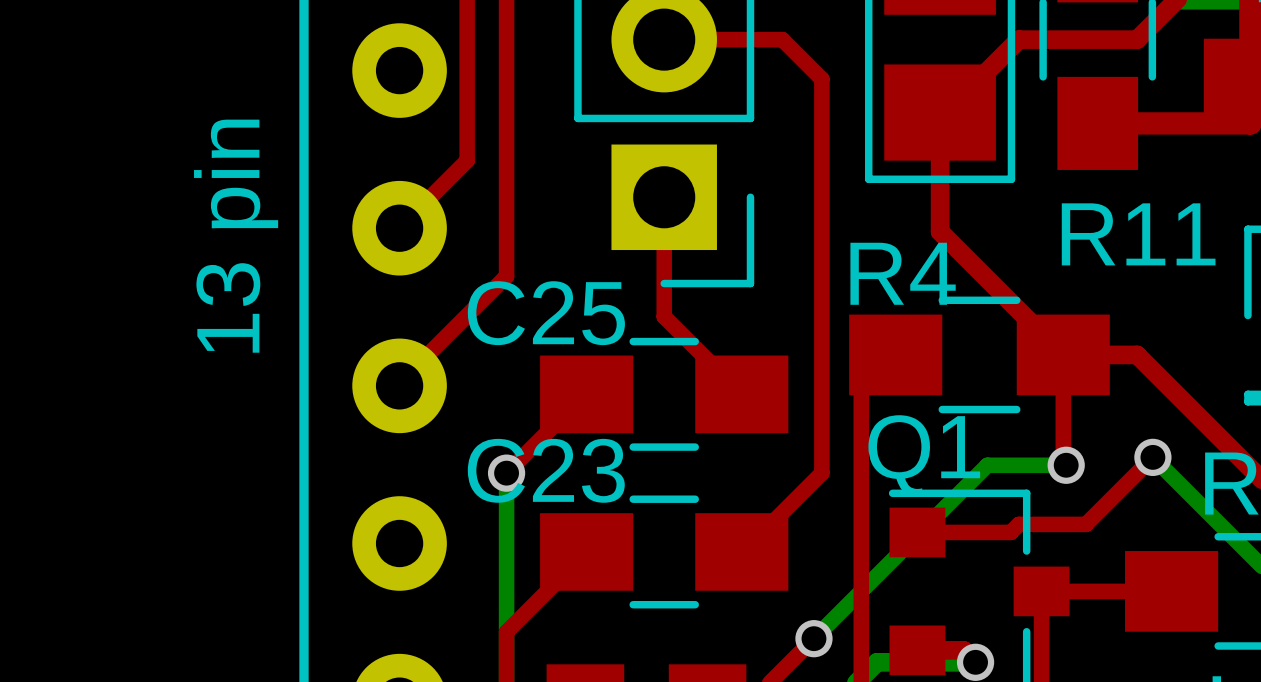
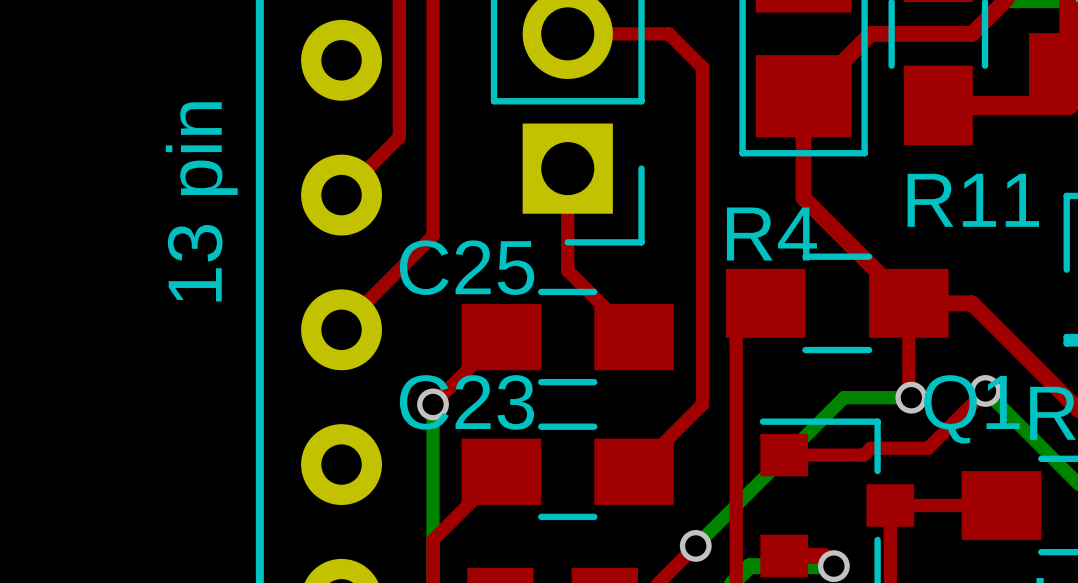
Q1 name position: Q1 (924, 455) -> Q1 (971, 409)

